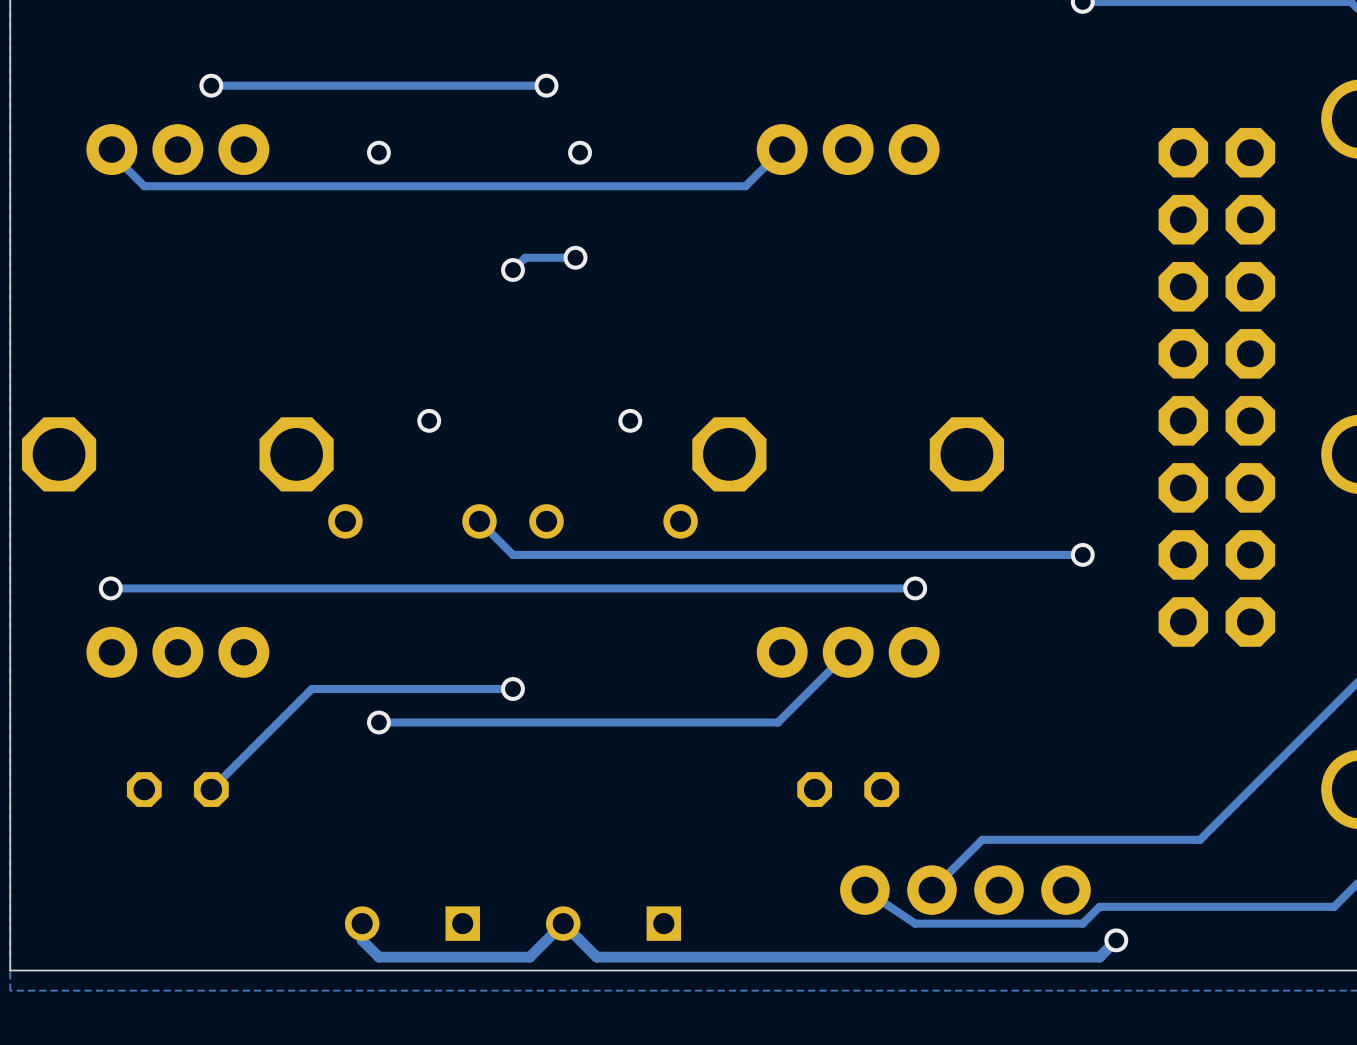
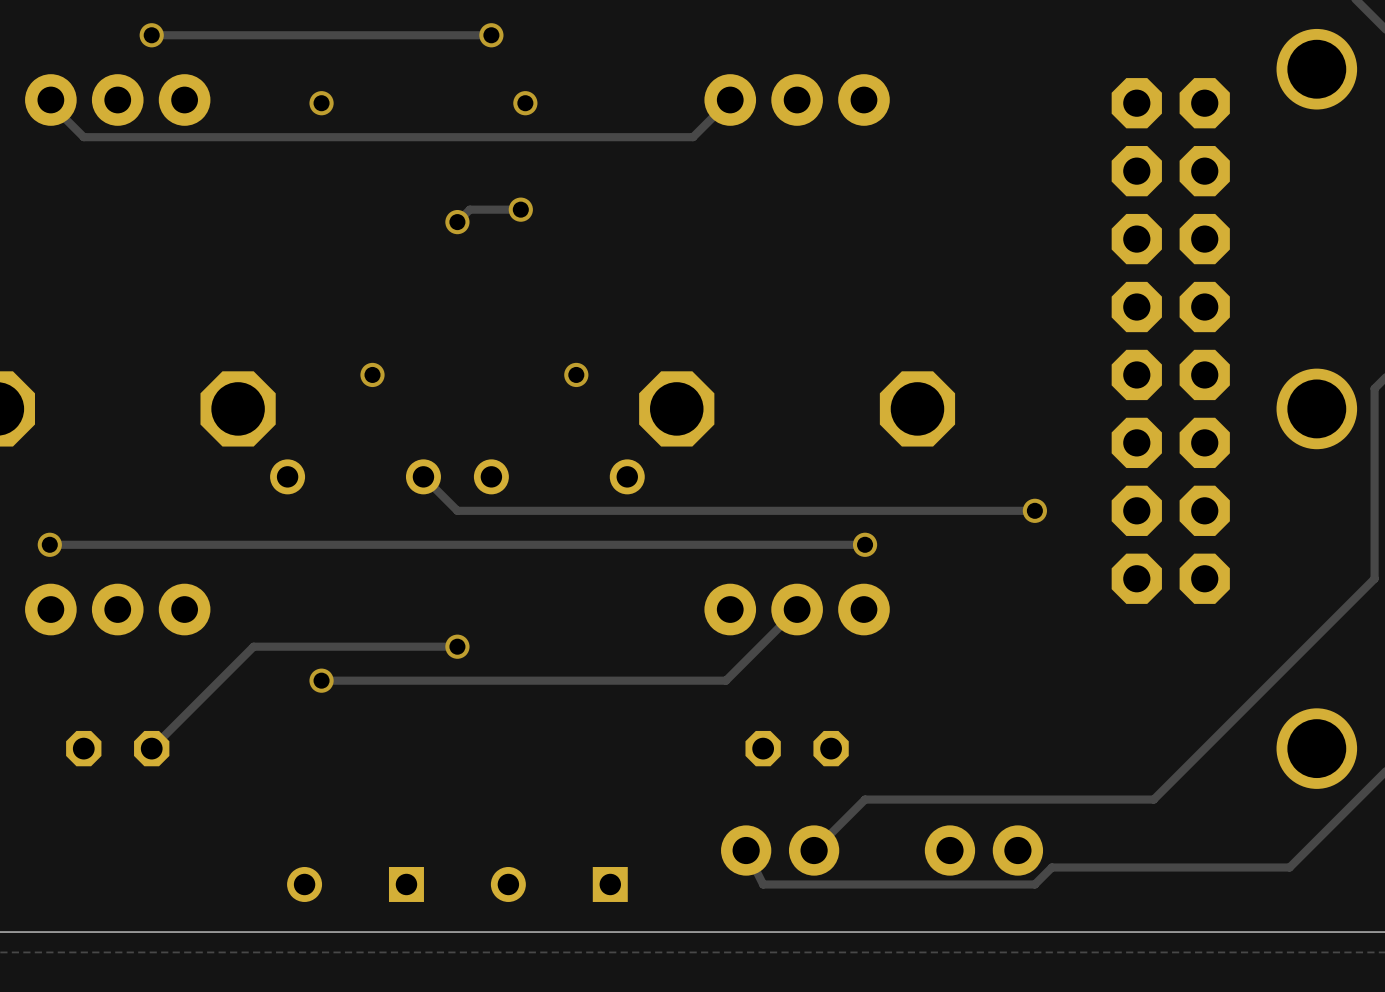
track: (982, 839) (931, 890) -> (932, 799) (865, 799) (814, 850)
track: (864, 890) (915, 923) -> (746, 850) (763, 884) (865, 884)
part position: (898, 890) -> (780, 850)
track: (362, 923) (362, 940) (378, 957) (529, 957) (563, 923) (596, 957) (1099, 957) (1116, 940) -> none
via: (1116, 940) -> none

